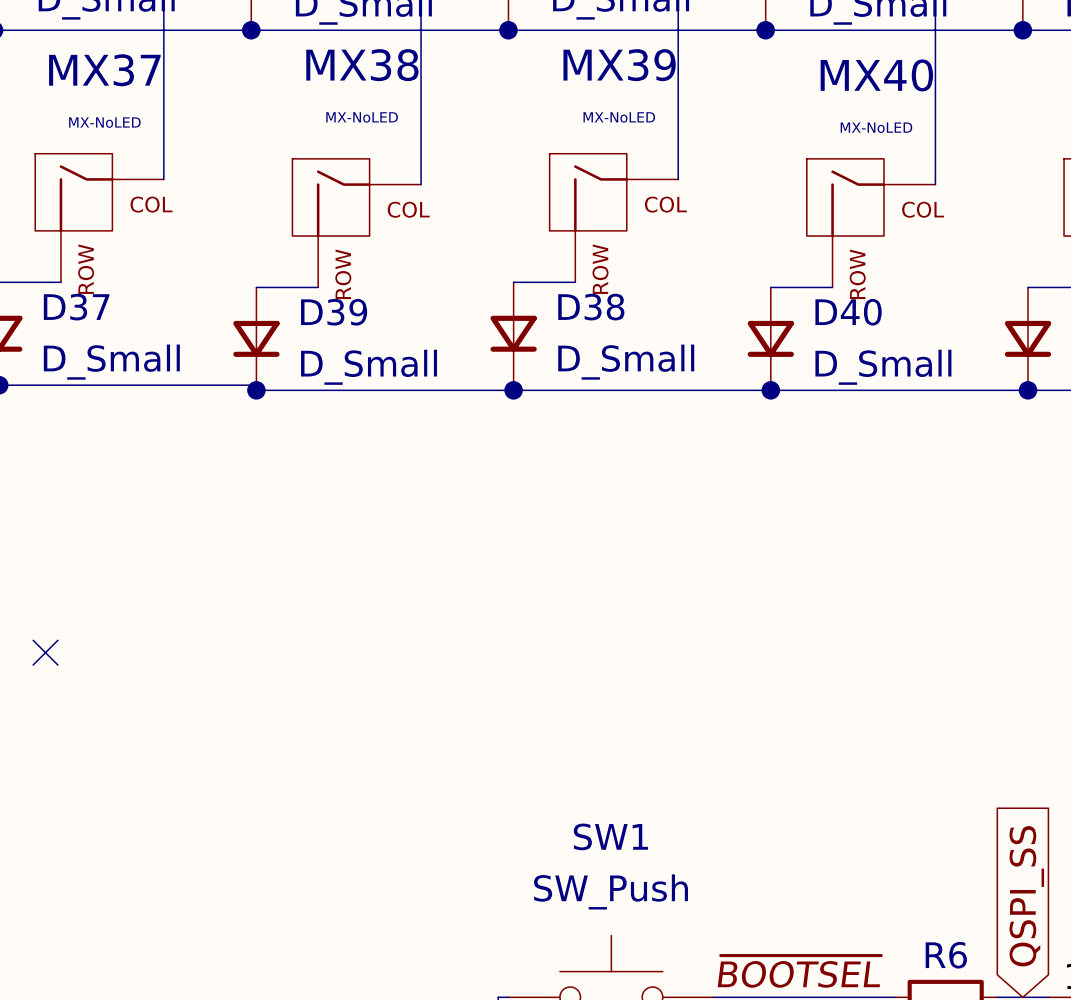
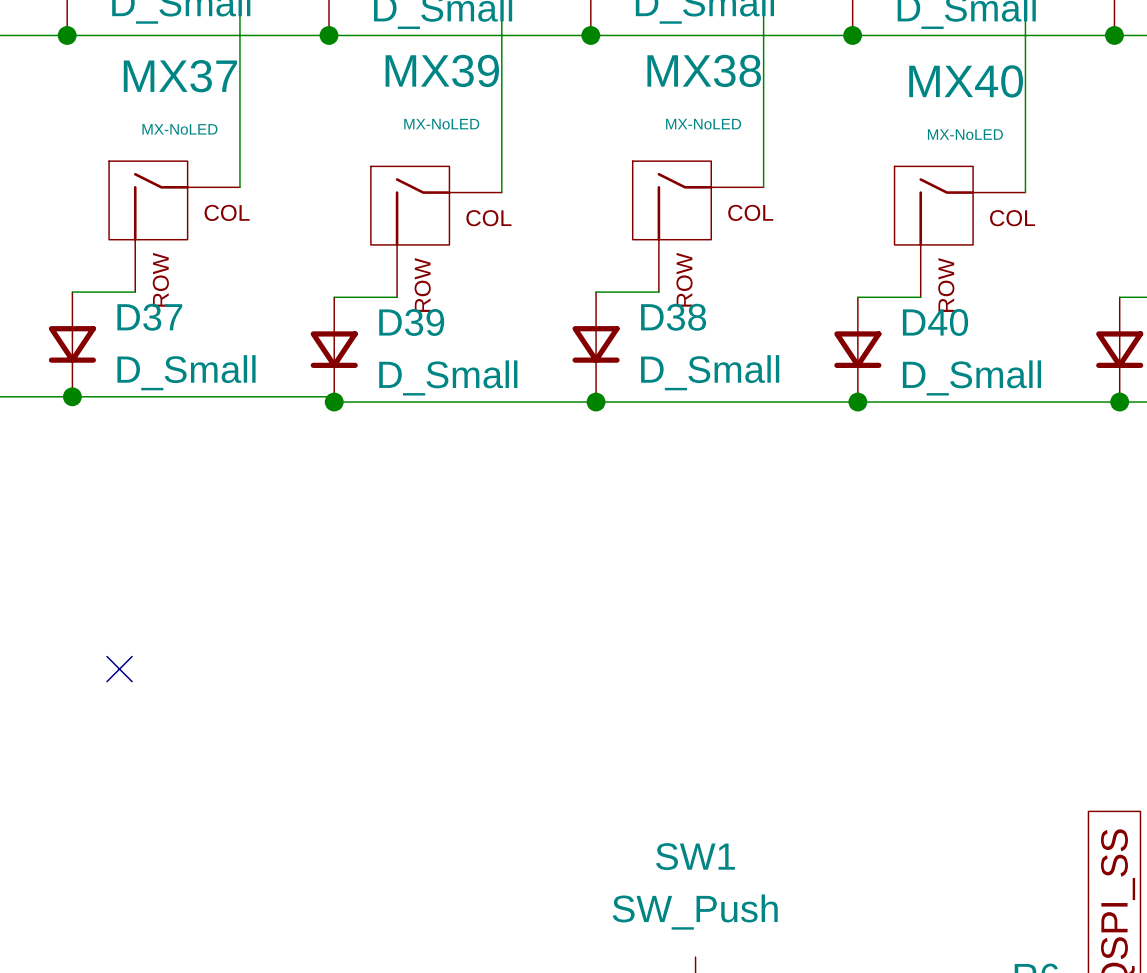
MX38 name: MX38 (362, 65) -> MX39 (442, 70)
MX39 name: MX39 (619, 65) -> MX38 (704, 70)

